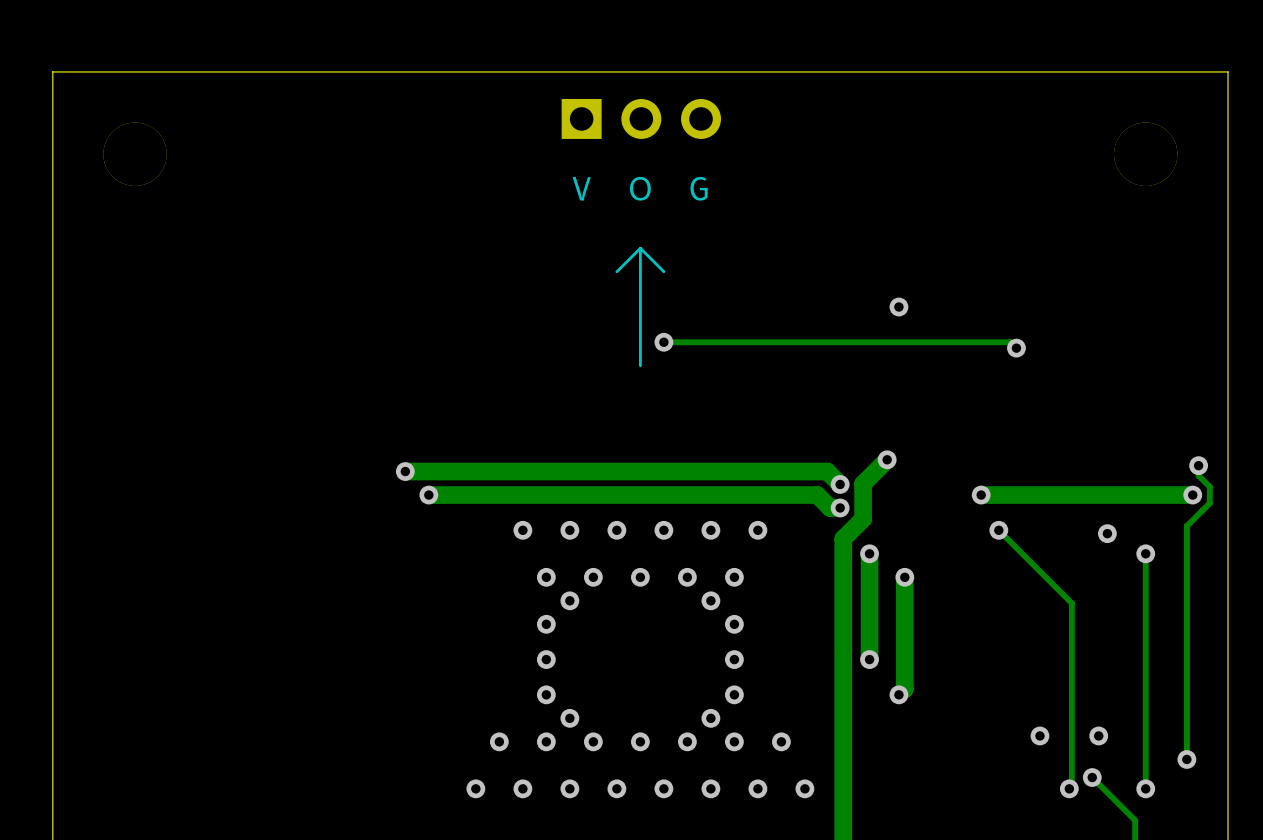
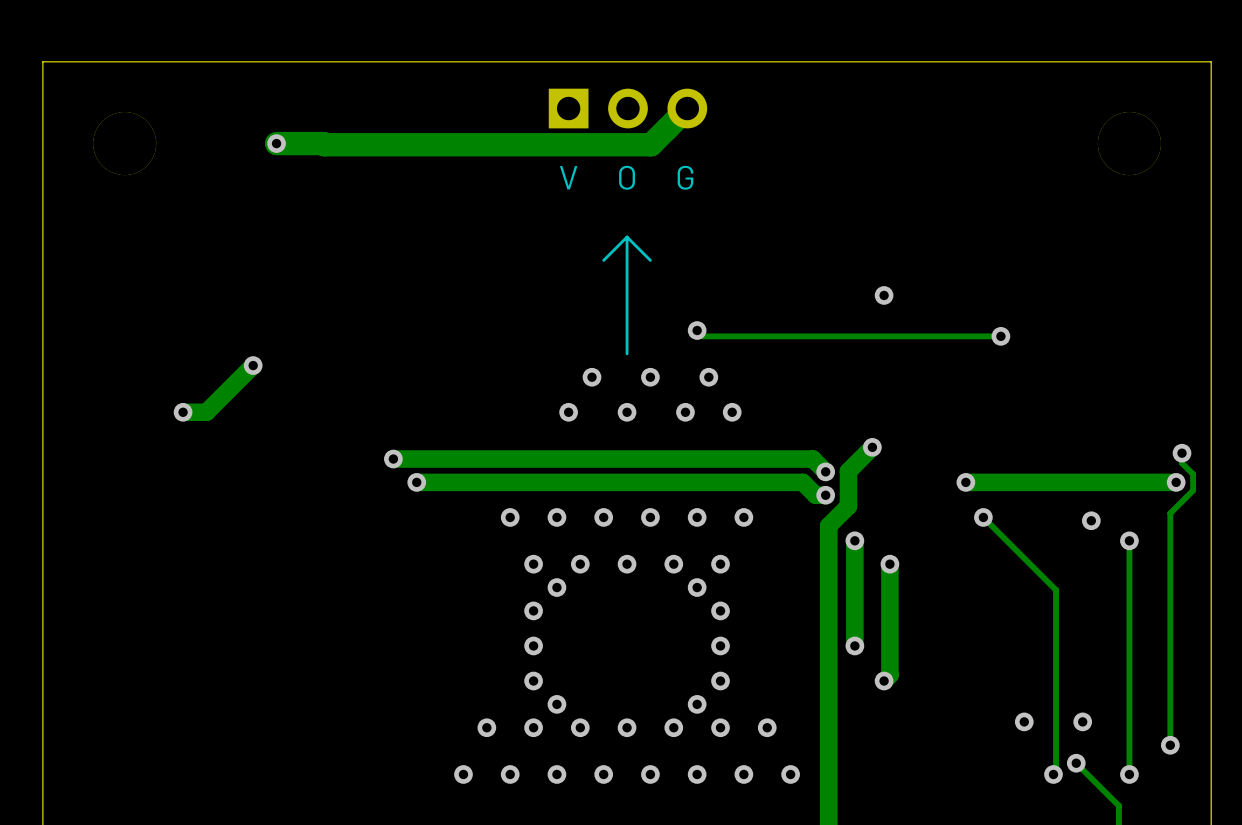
track: none -> (687, 108) (651, 144) (276, 143)
via: none -> (276, 143)
track: (663, 342) (1010, 342) (1016, 348) -> (697, 330) (702, 336) (1000, 336)
via: (663, 342) -> none
via: none -> (697, 330)
track: none -> (253, 365) (206, 412) (183, 412)
via: none -> (253, 365)
via: none -> (592, 377)
via: none -> (650, 377)
via: none -> (708, 377)
via: none -> (183, 412)
via: none -> (568, 412)
via: none -> (627, 412)
via: none -> (685, 412)
via: none -> (732, 412)

